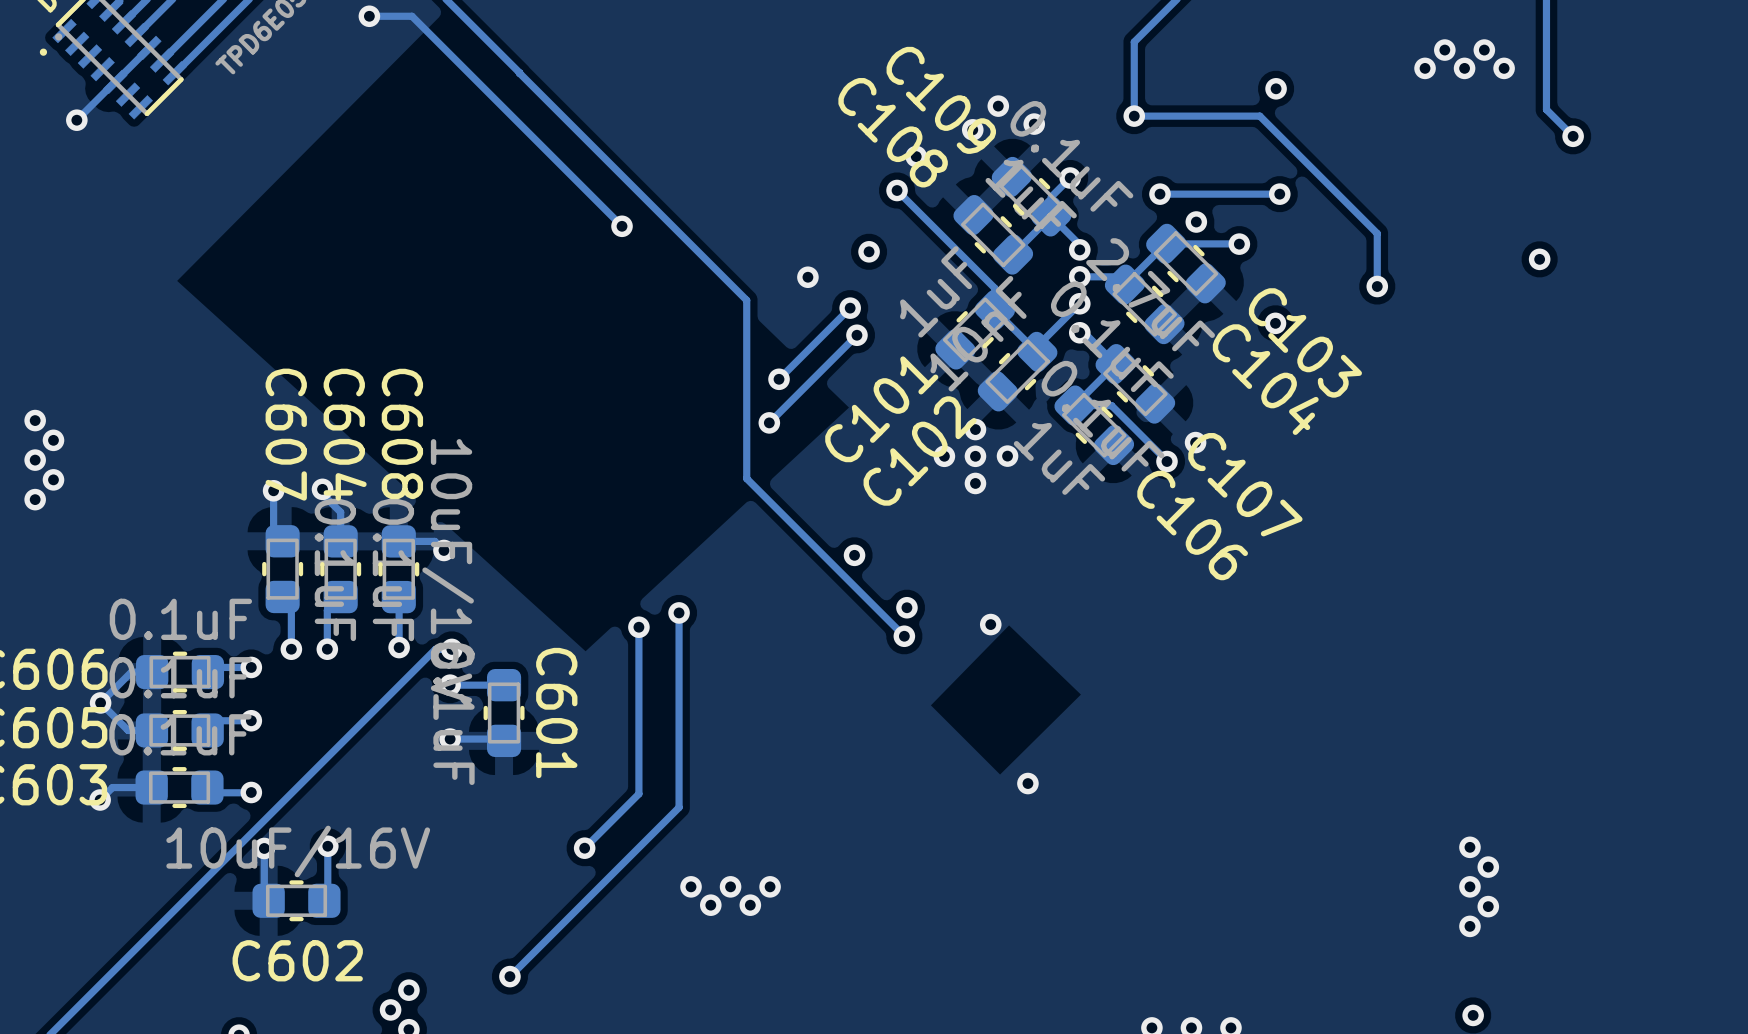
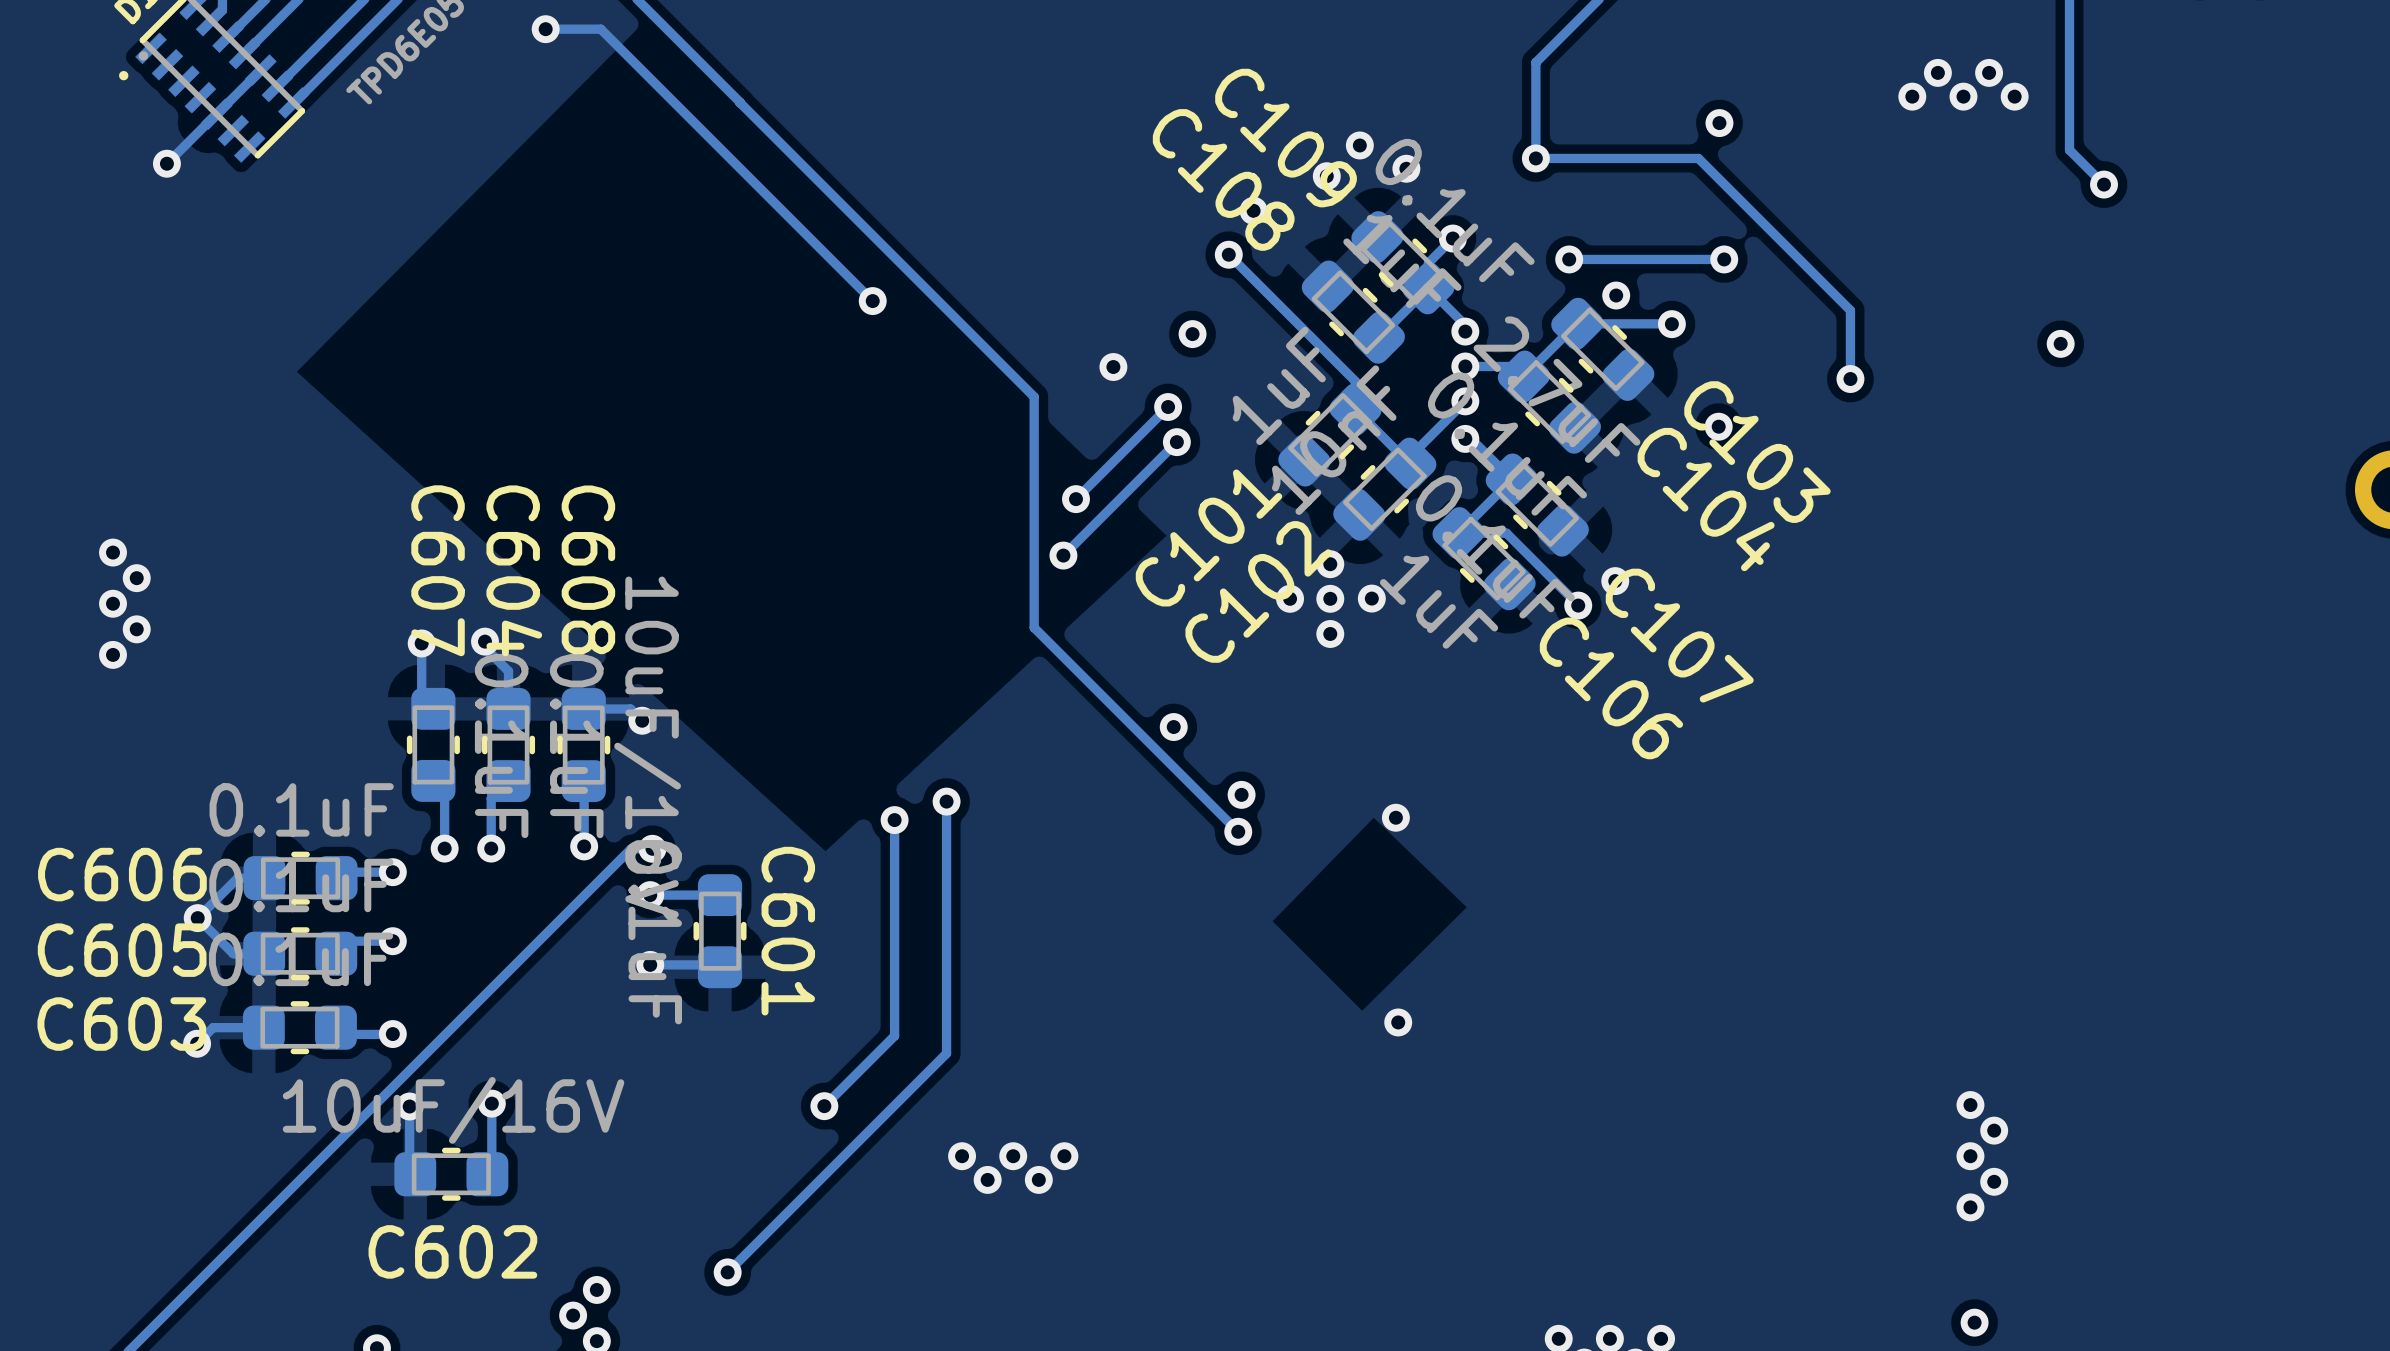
via position: (990, 624) -> (1395, 817)

